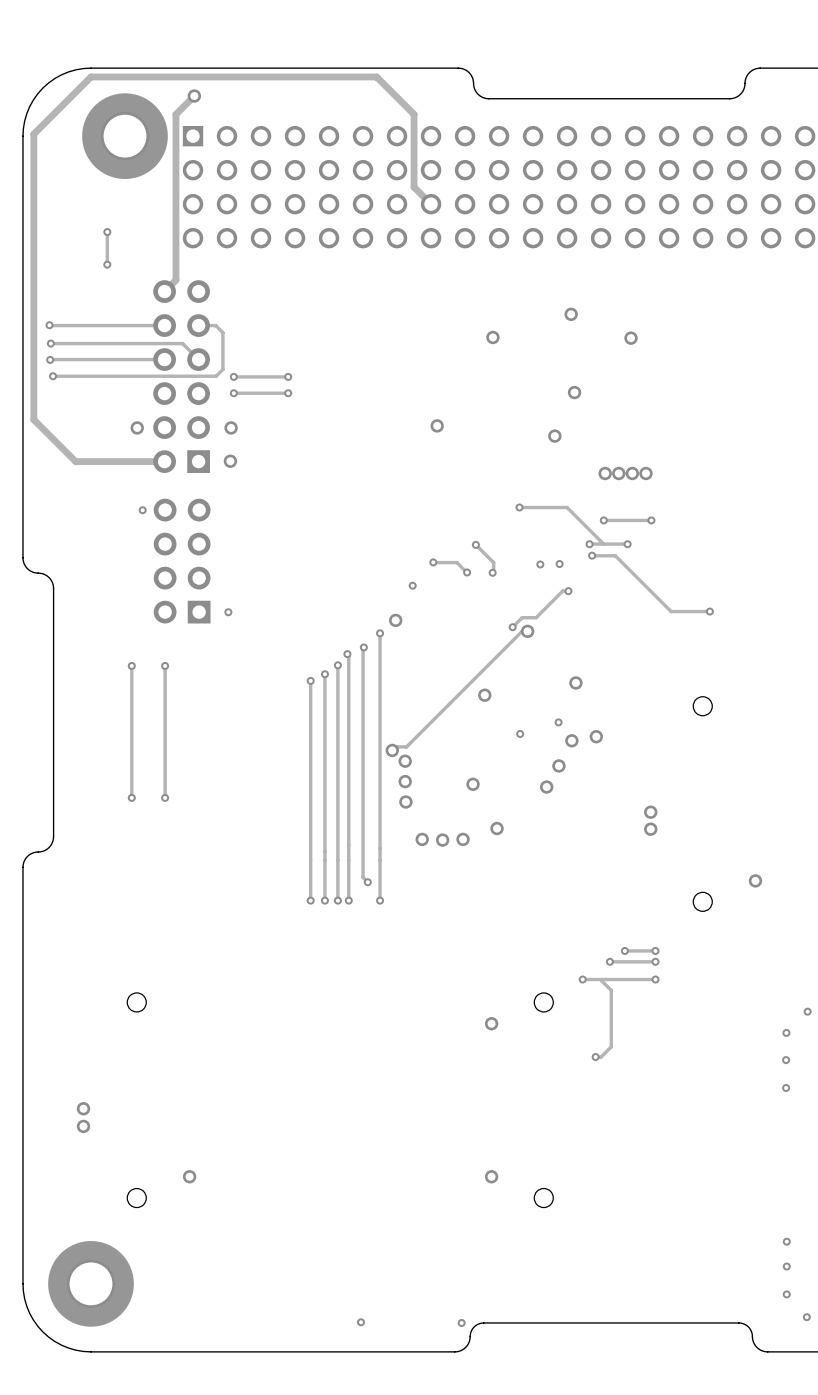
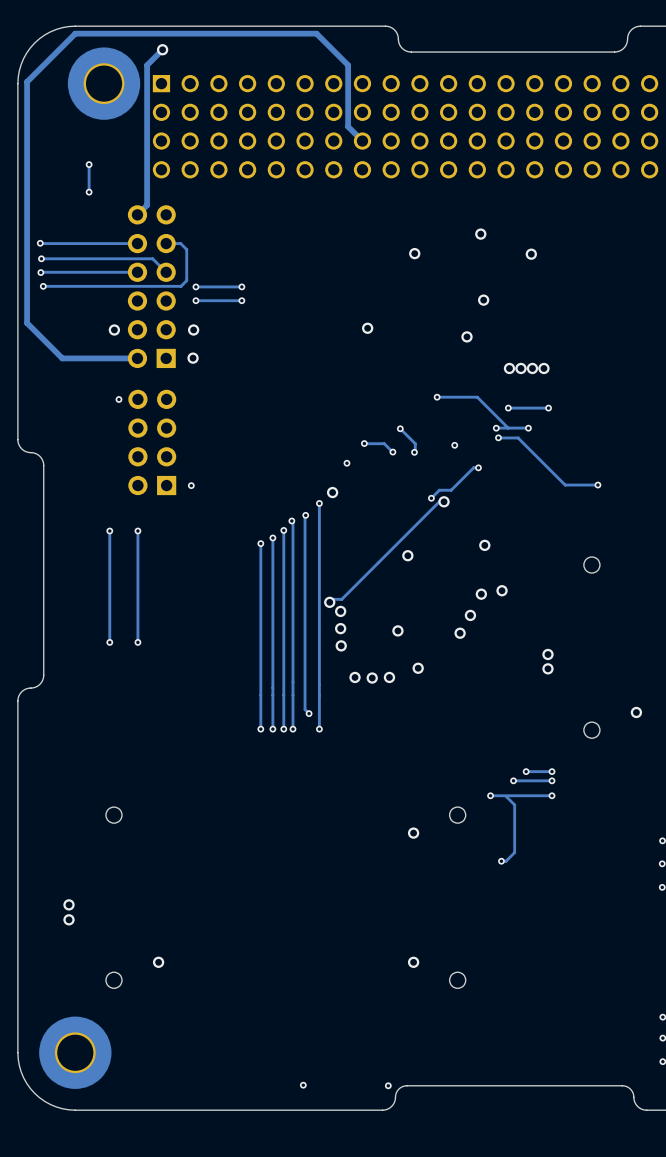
via: (559, 564) -> none
via: (558, 722) -> none
via: (520, 733) -> none

